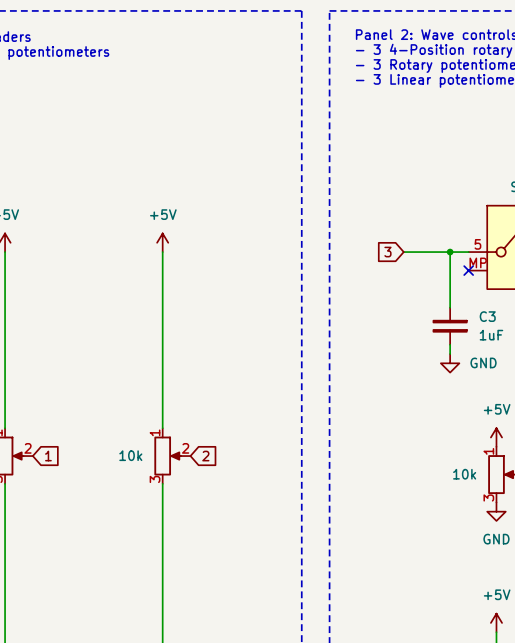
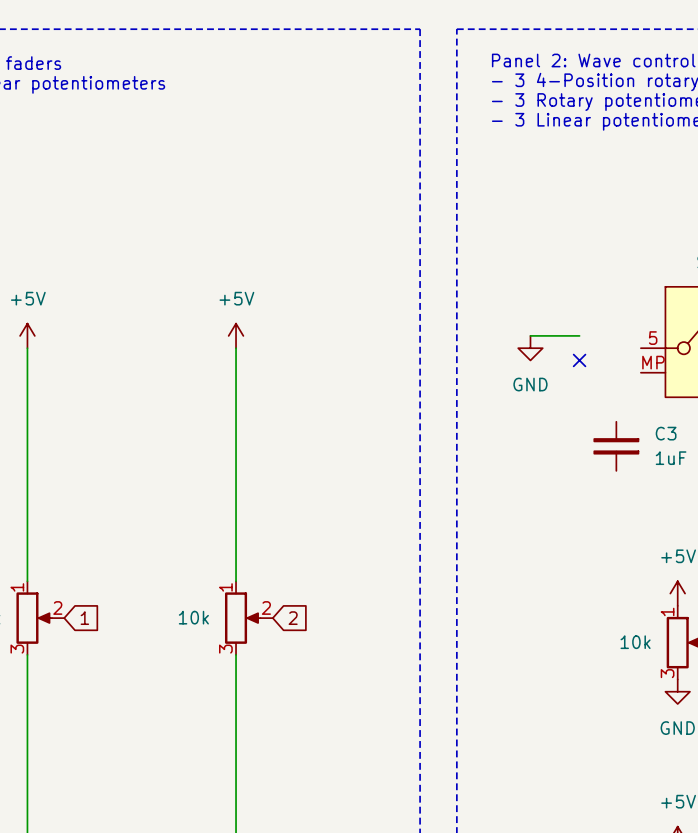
wire: none -> (530, 335) (579, 335)
power symbol: none -> GND (530, 348)
global label: 3 (387, 252) -> none
wire: (403, 252) (468, 252) -> none
wire: (450, 252) (450, 307) -> none
junction: (450, 252) -> none
no-connect mark: none -> (579, 360)
no-connect mark: (468, 270) -> none
wire: (450, 344) (450, 354) -> none
power symbol: GND (450, 363) -> none

